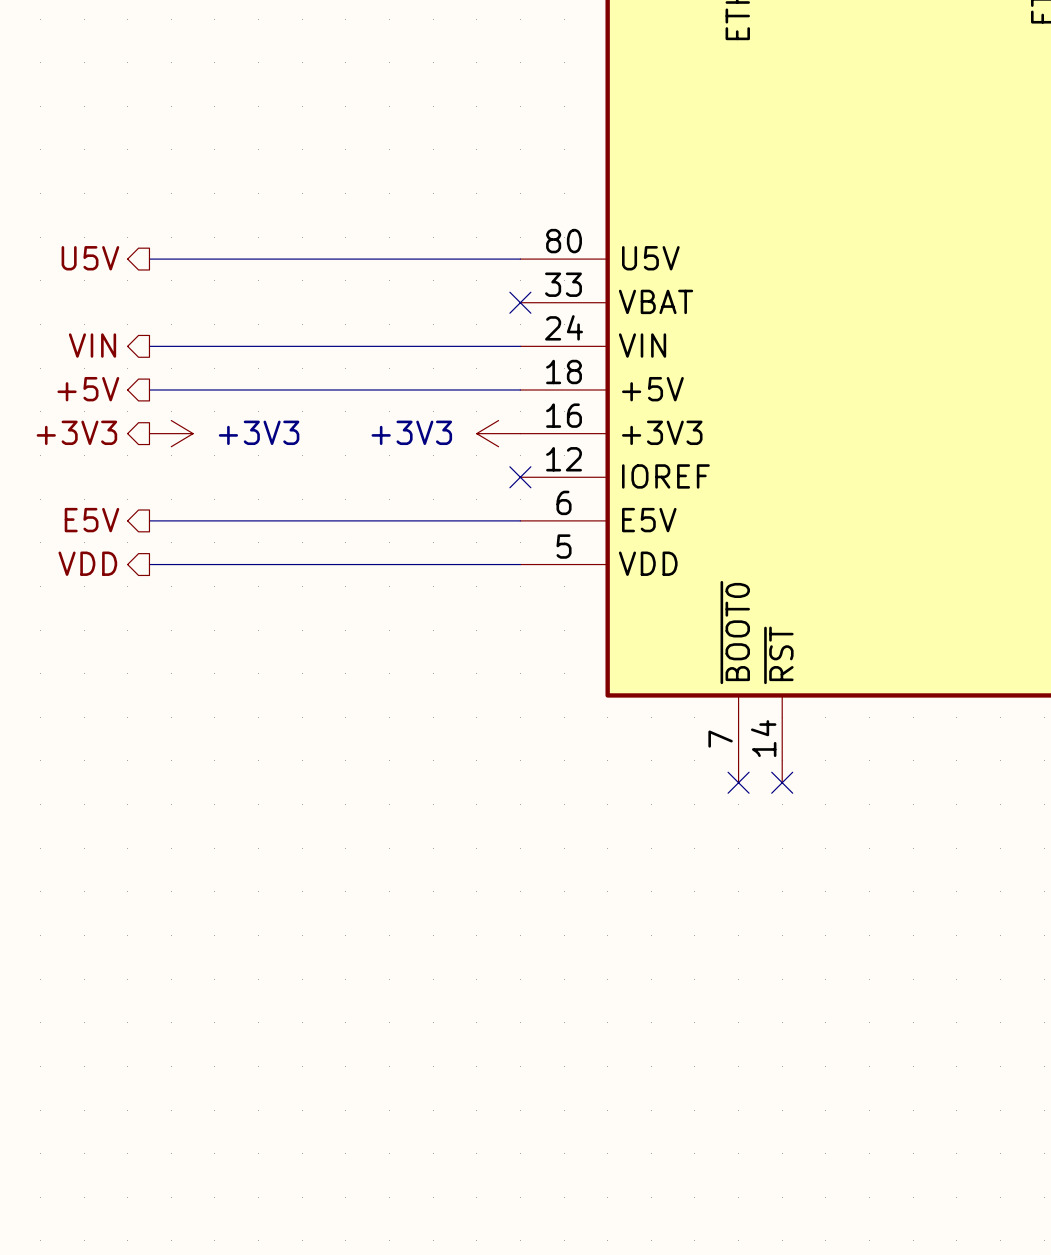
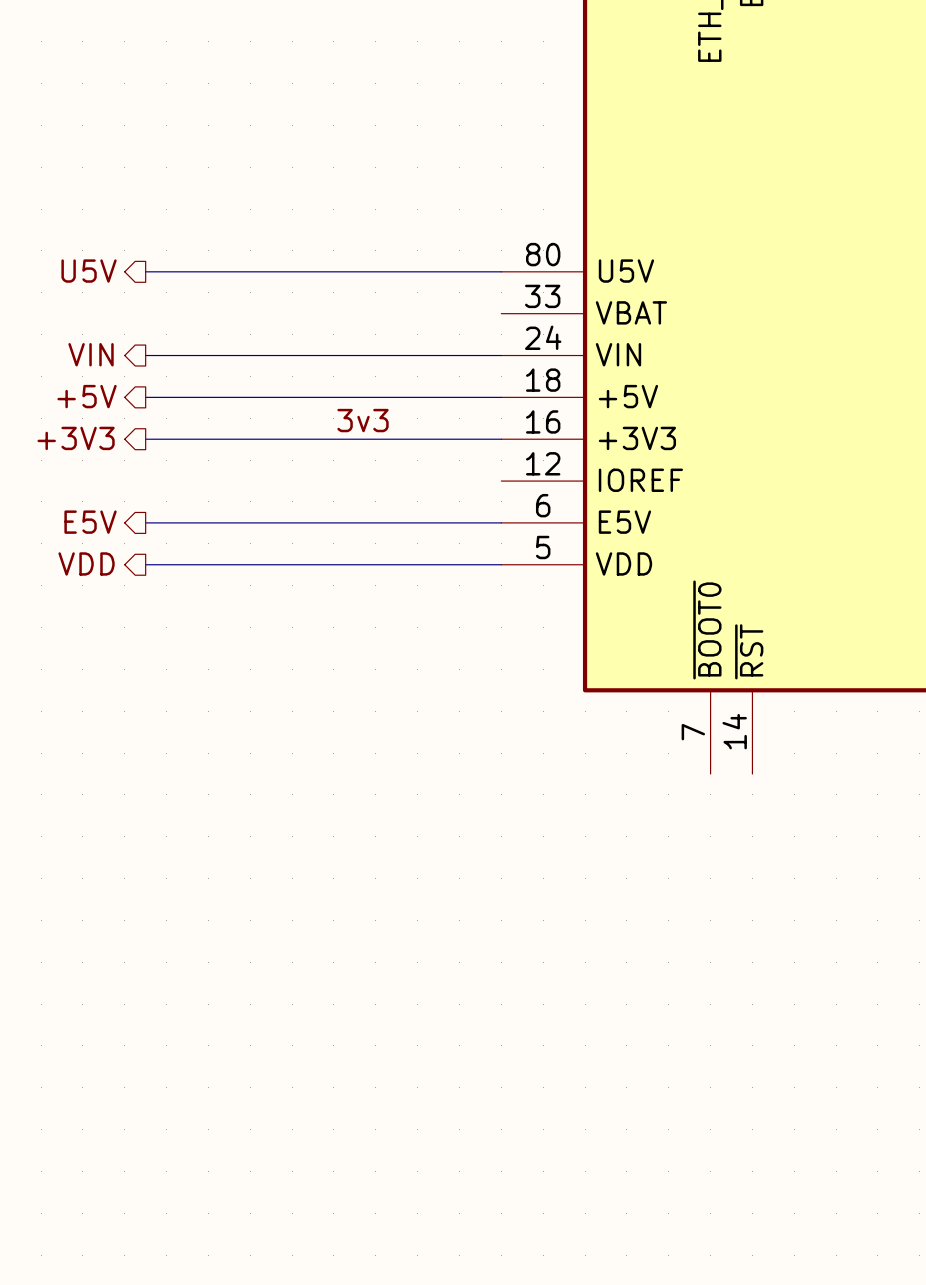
no-connect mark: (520, 302) -> none
label: none -> 3v3 (363, 420)
wire: none -> (145, 439) (501, 439)
power symbol: +3V3 (171, 433) -> none
power symbol: +3V3 (498, 433) -> none
no-connect mark: (520, 477) -> none
no-connect mark: (738, 782) -> none
no-connect mark: (782, 782) -> none

